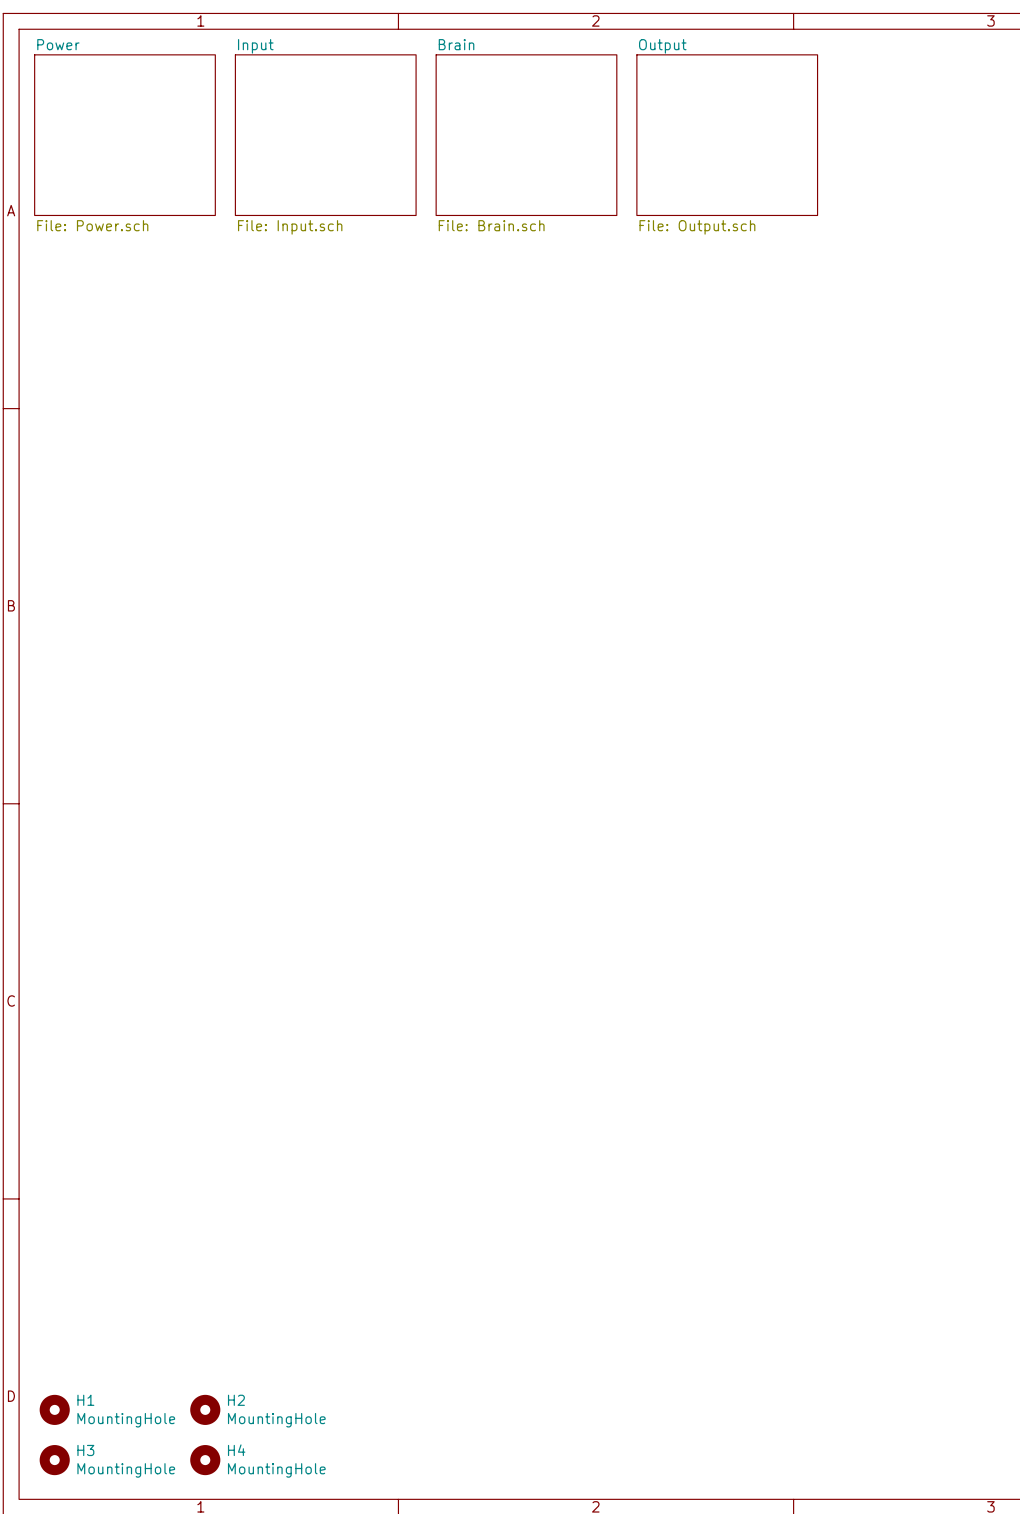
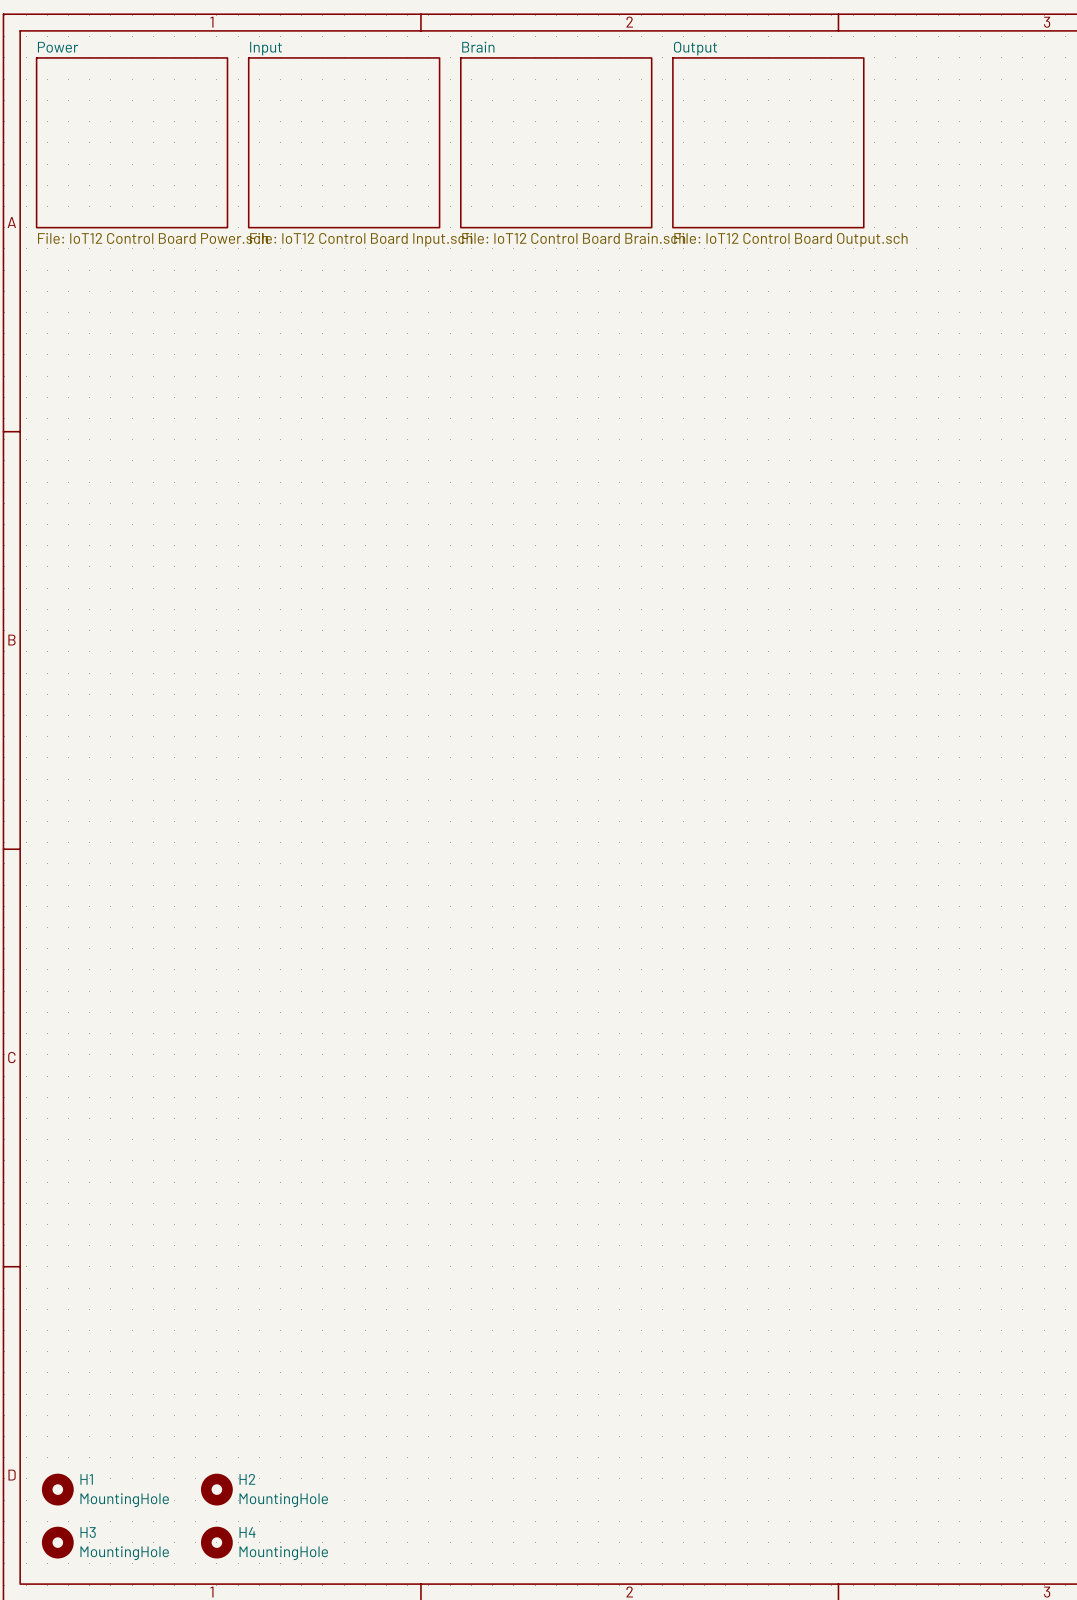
sheet Power value: File: Power.sch (92, 225) -> File: IoT12 Control Board Power.sch (152, 238)
sheet Brain value: File: Brain.sch (491, 225) -> File: IoT12 Control Board Brain.sch (573, 238)
sheet Input value: File: Input.sch (290, 227) -> File: IoT12 Control Board Input.sch (361, 239)
sheet Output value: File: Output.sch (697, 227) -> File: IoT12 Control Board Output.sch (790, 239)

